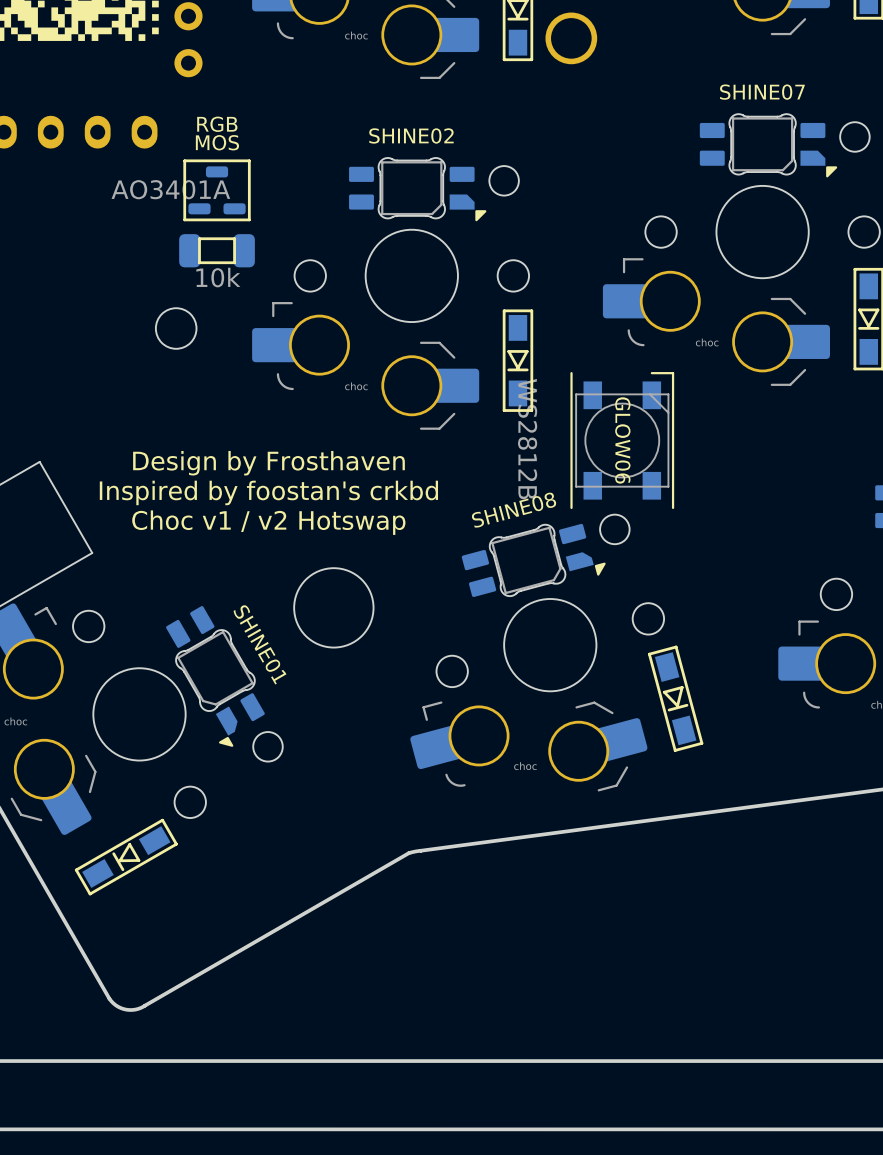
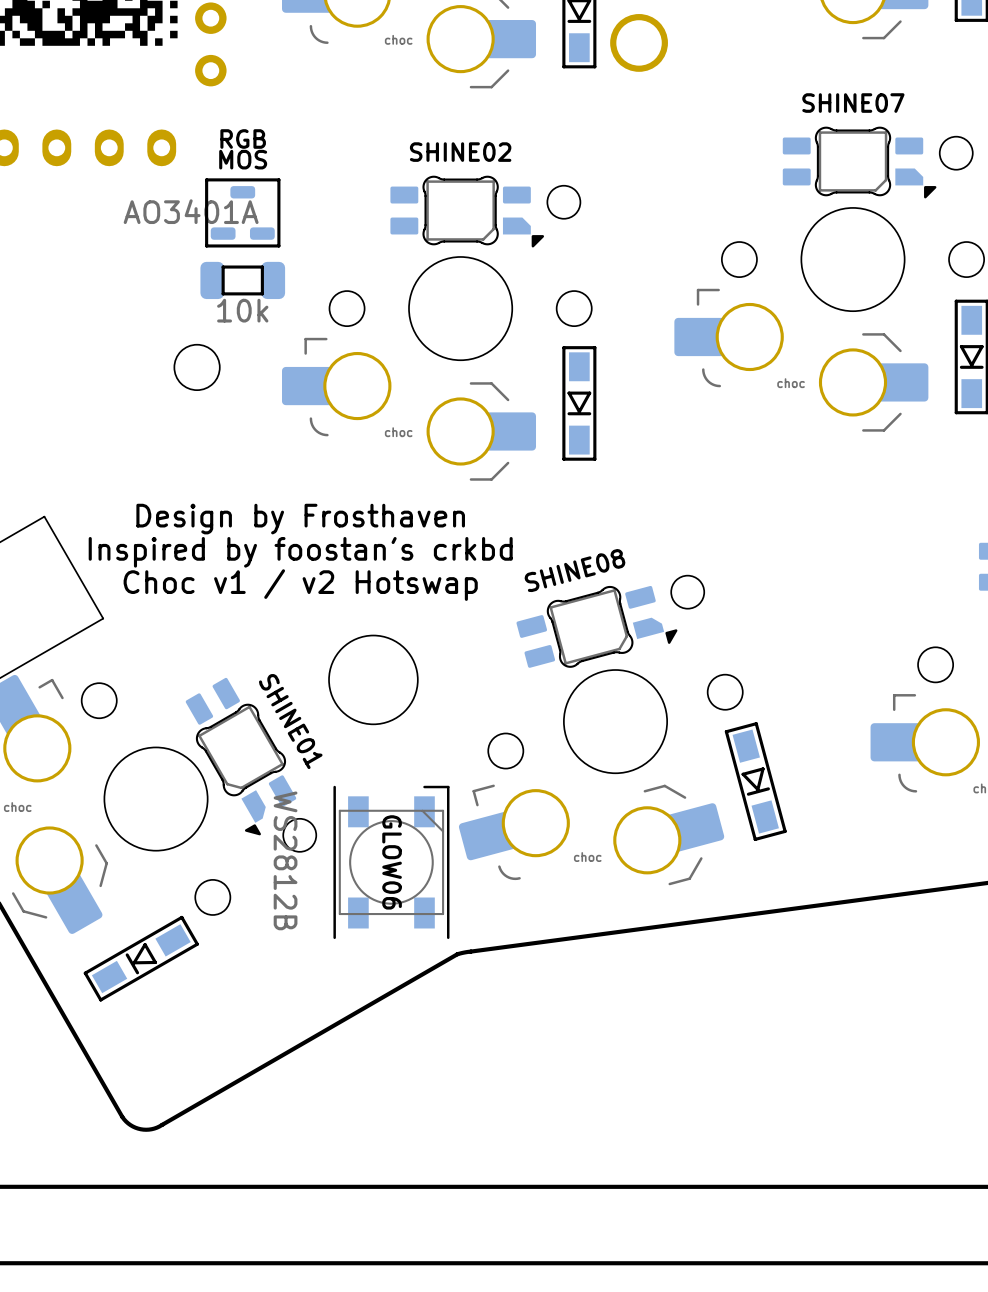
GLOW06 position: (622, 440) -> (391, 862)

